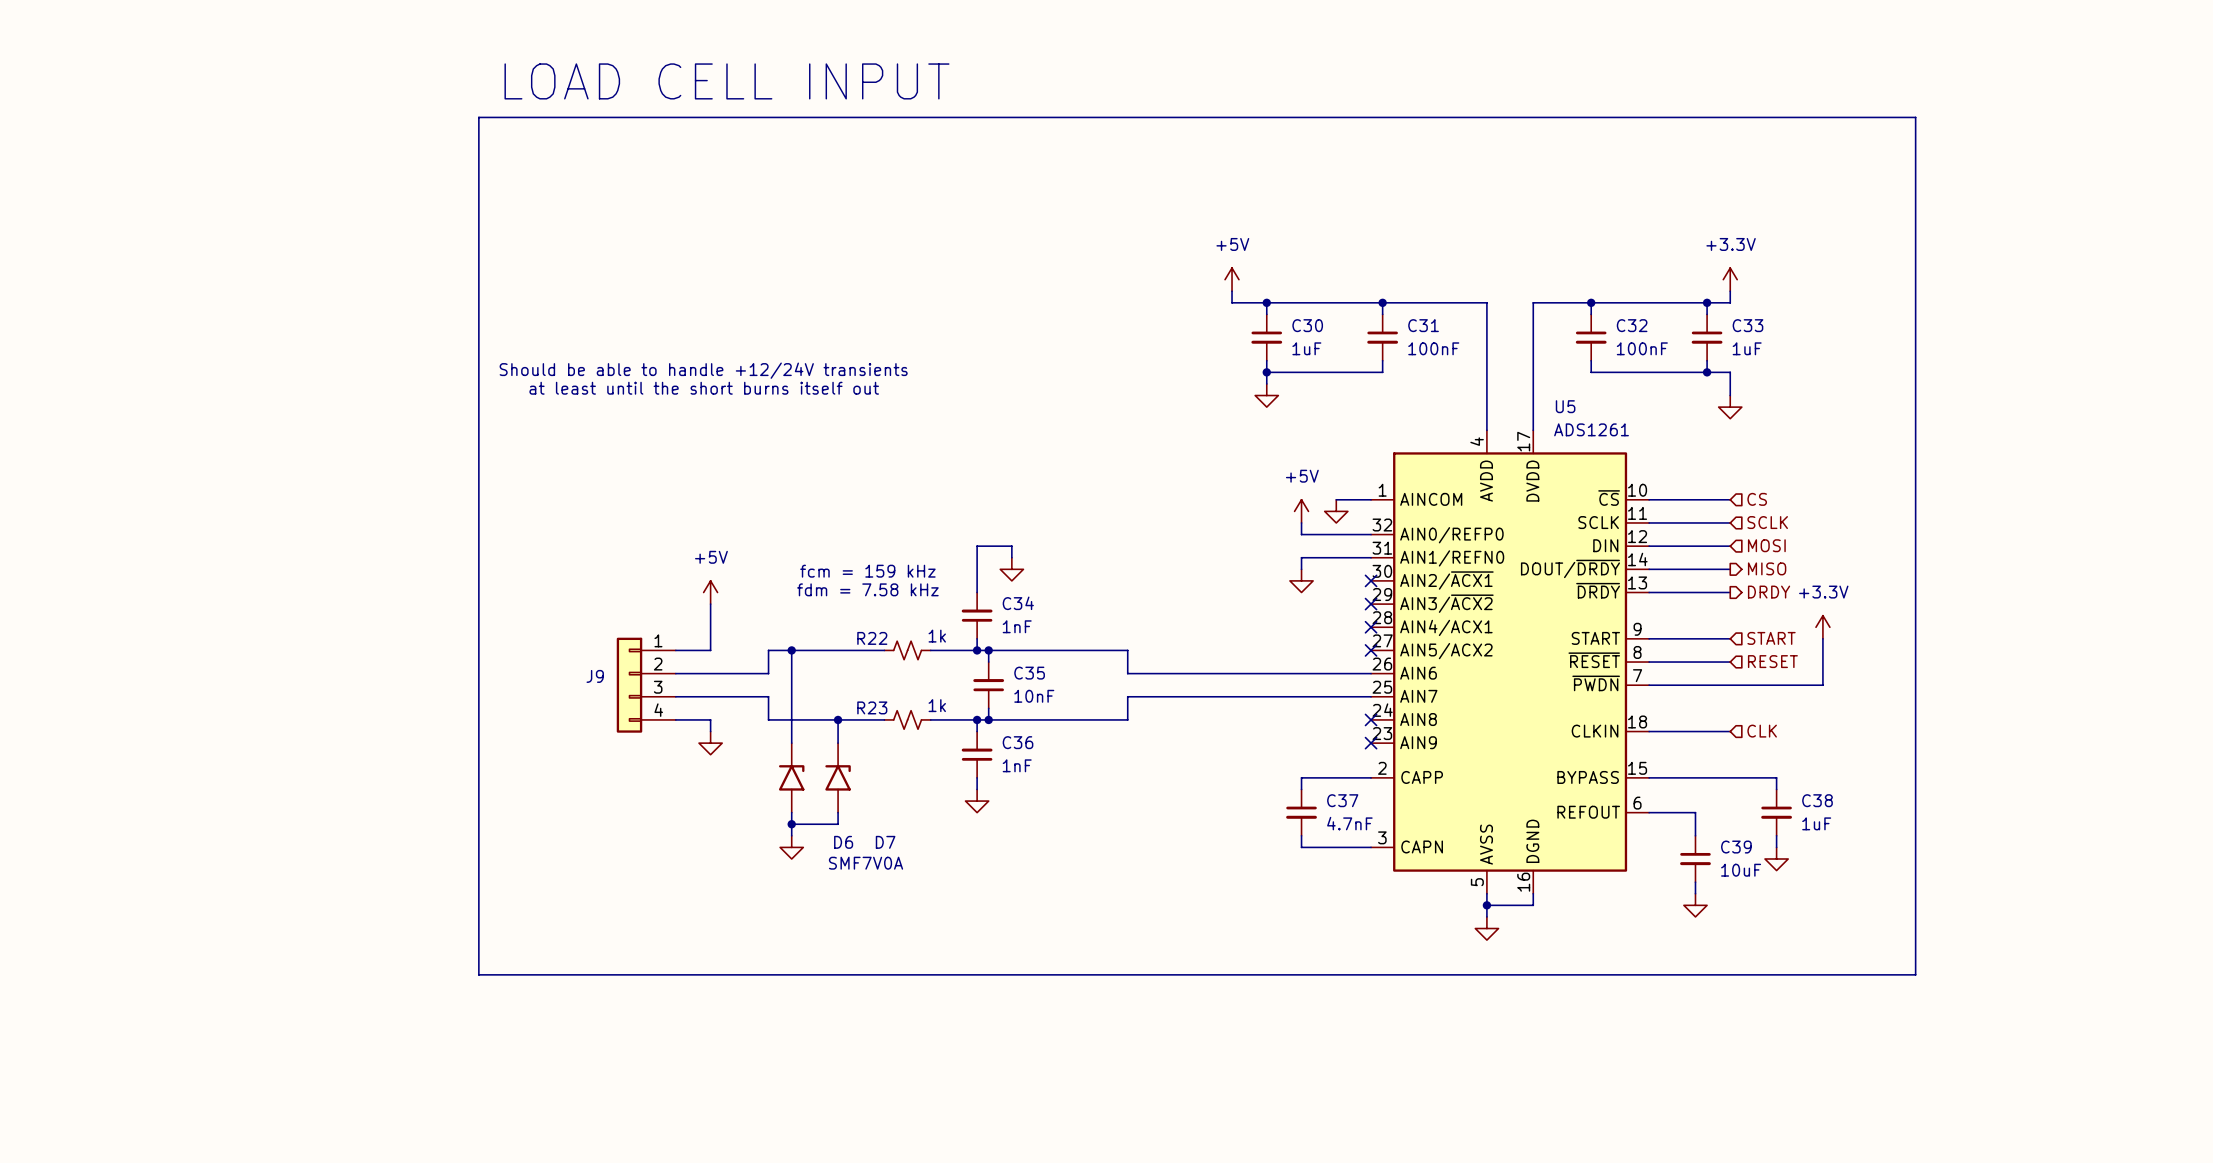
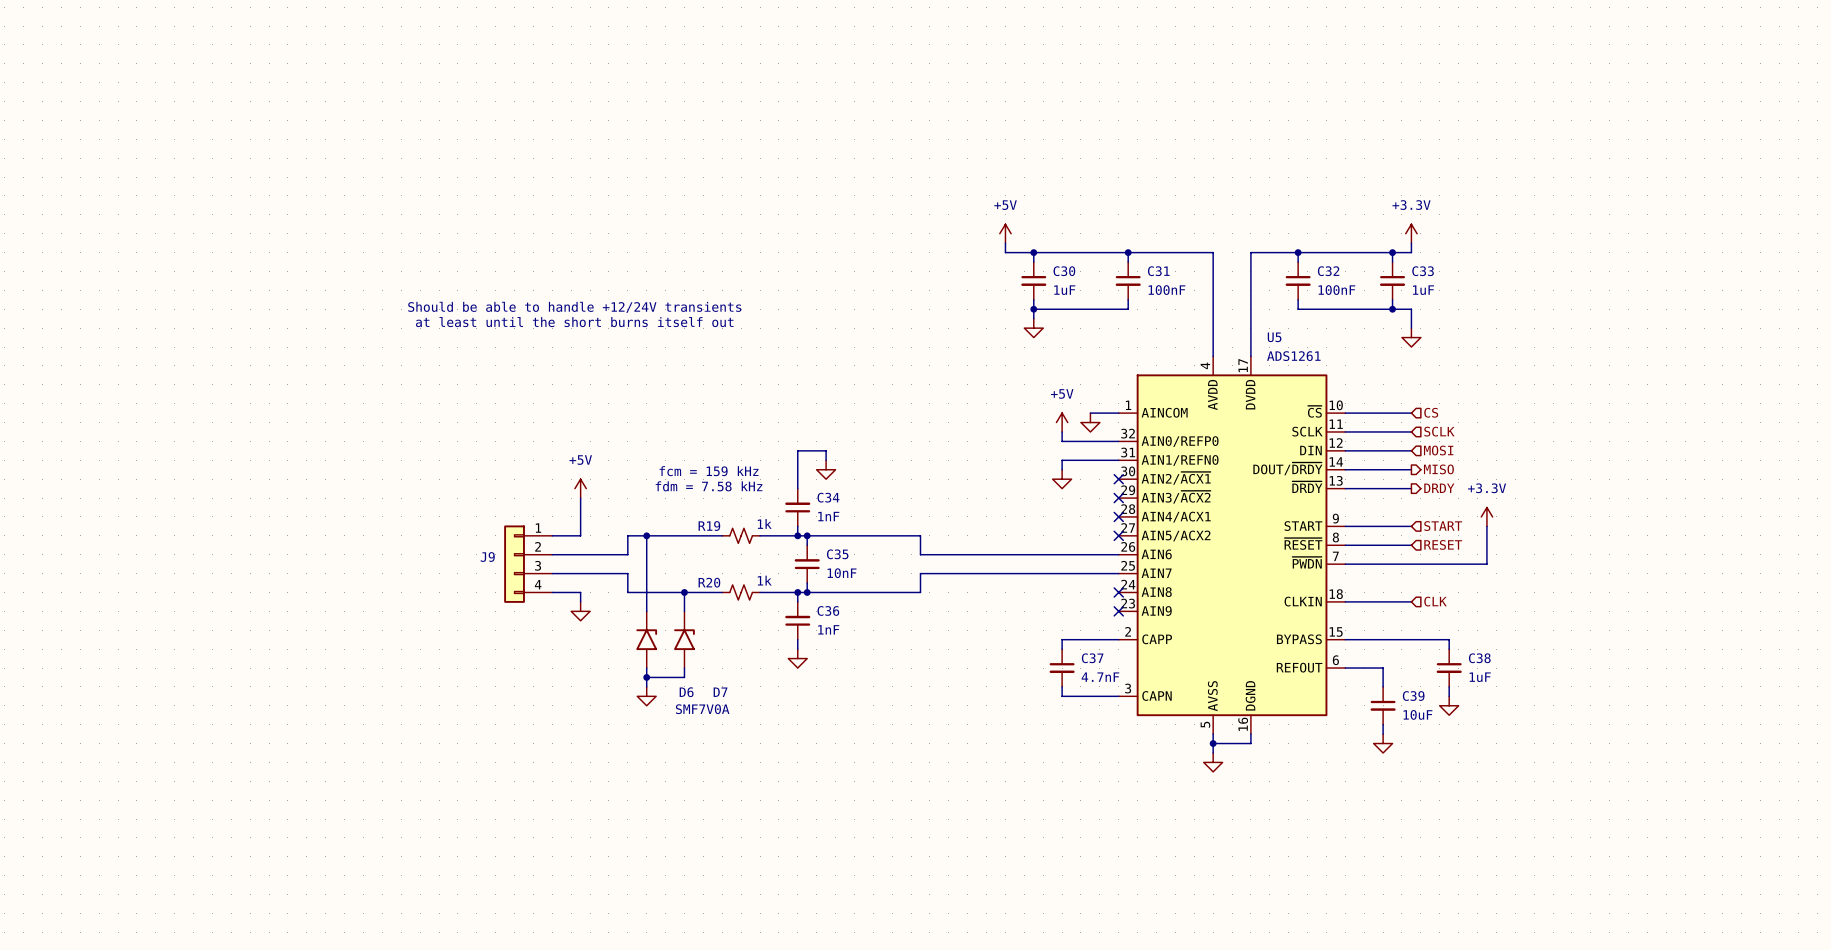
text: LOAD CELL INPUT (726, 81) -> none
line: (478, 117) (1915, 117) (1915, 974) (478, 974) (478, 117) -> none
R22 name: R22 (872, 638) -> R19 (709, 526)
R23 name: R23 (872, 707) -> R20 (709, 582)

